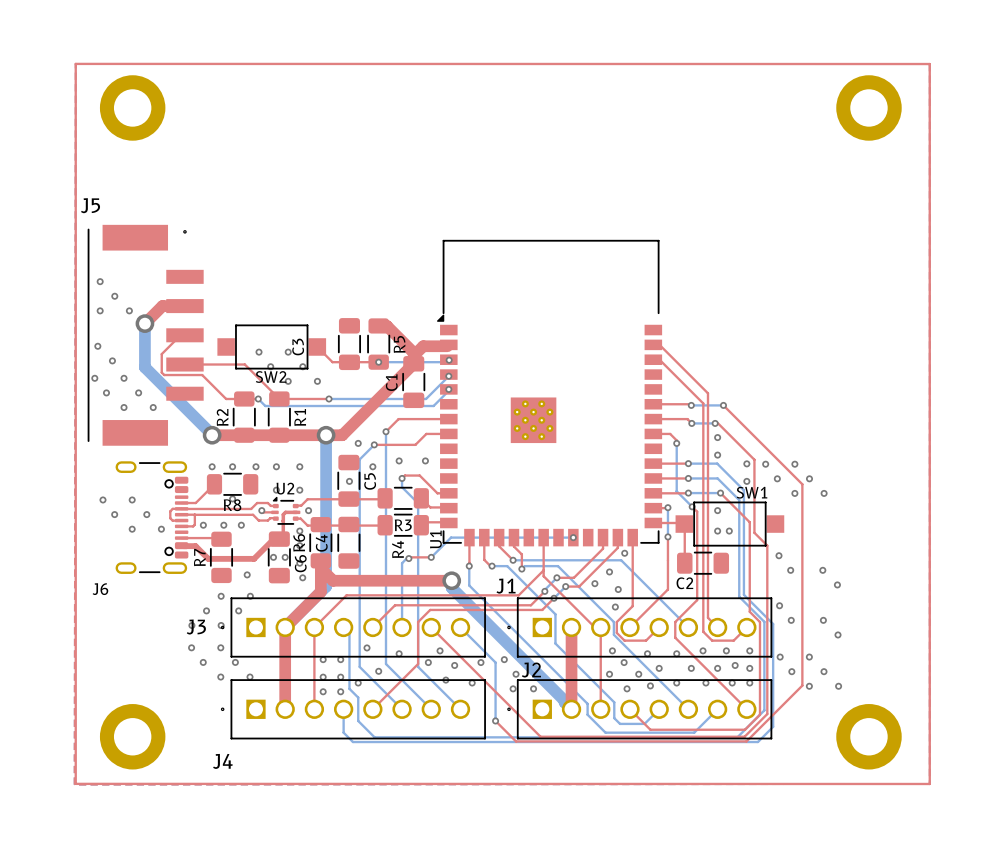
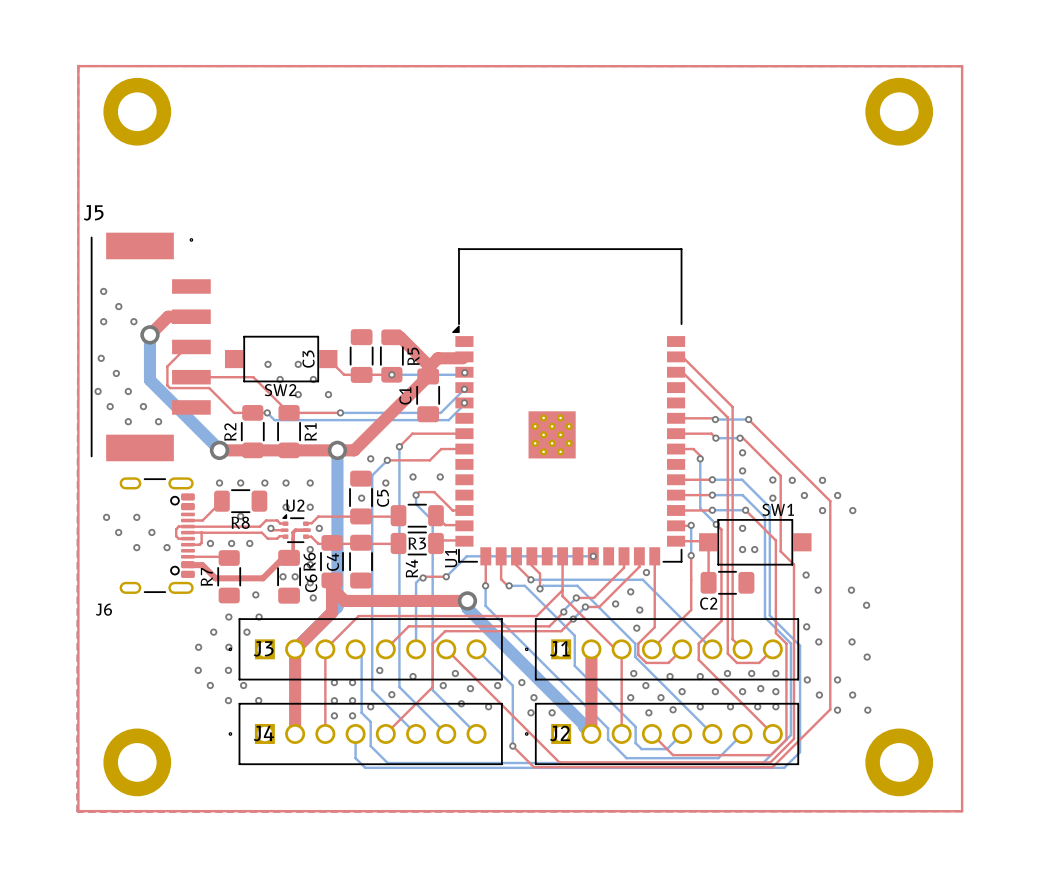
J1 name position: J1 (506, 586) -> J1 (559, 648)
J3 name position: J3 (196, 627) -> J3 (263, 648)
J2 name position: J2 (531, 670) -> J2 (559, 733)
J4 name position: J4 (222, 761) -> J4 (263, 733)

